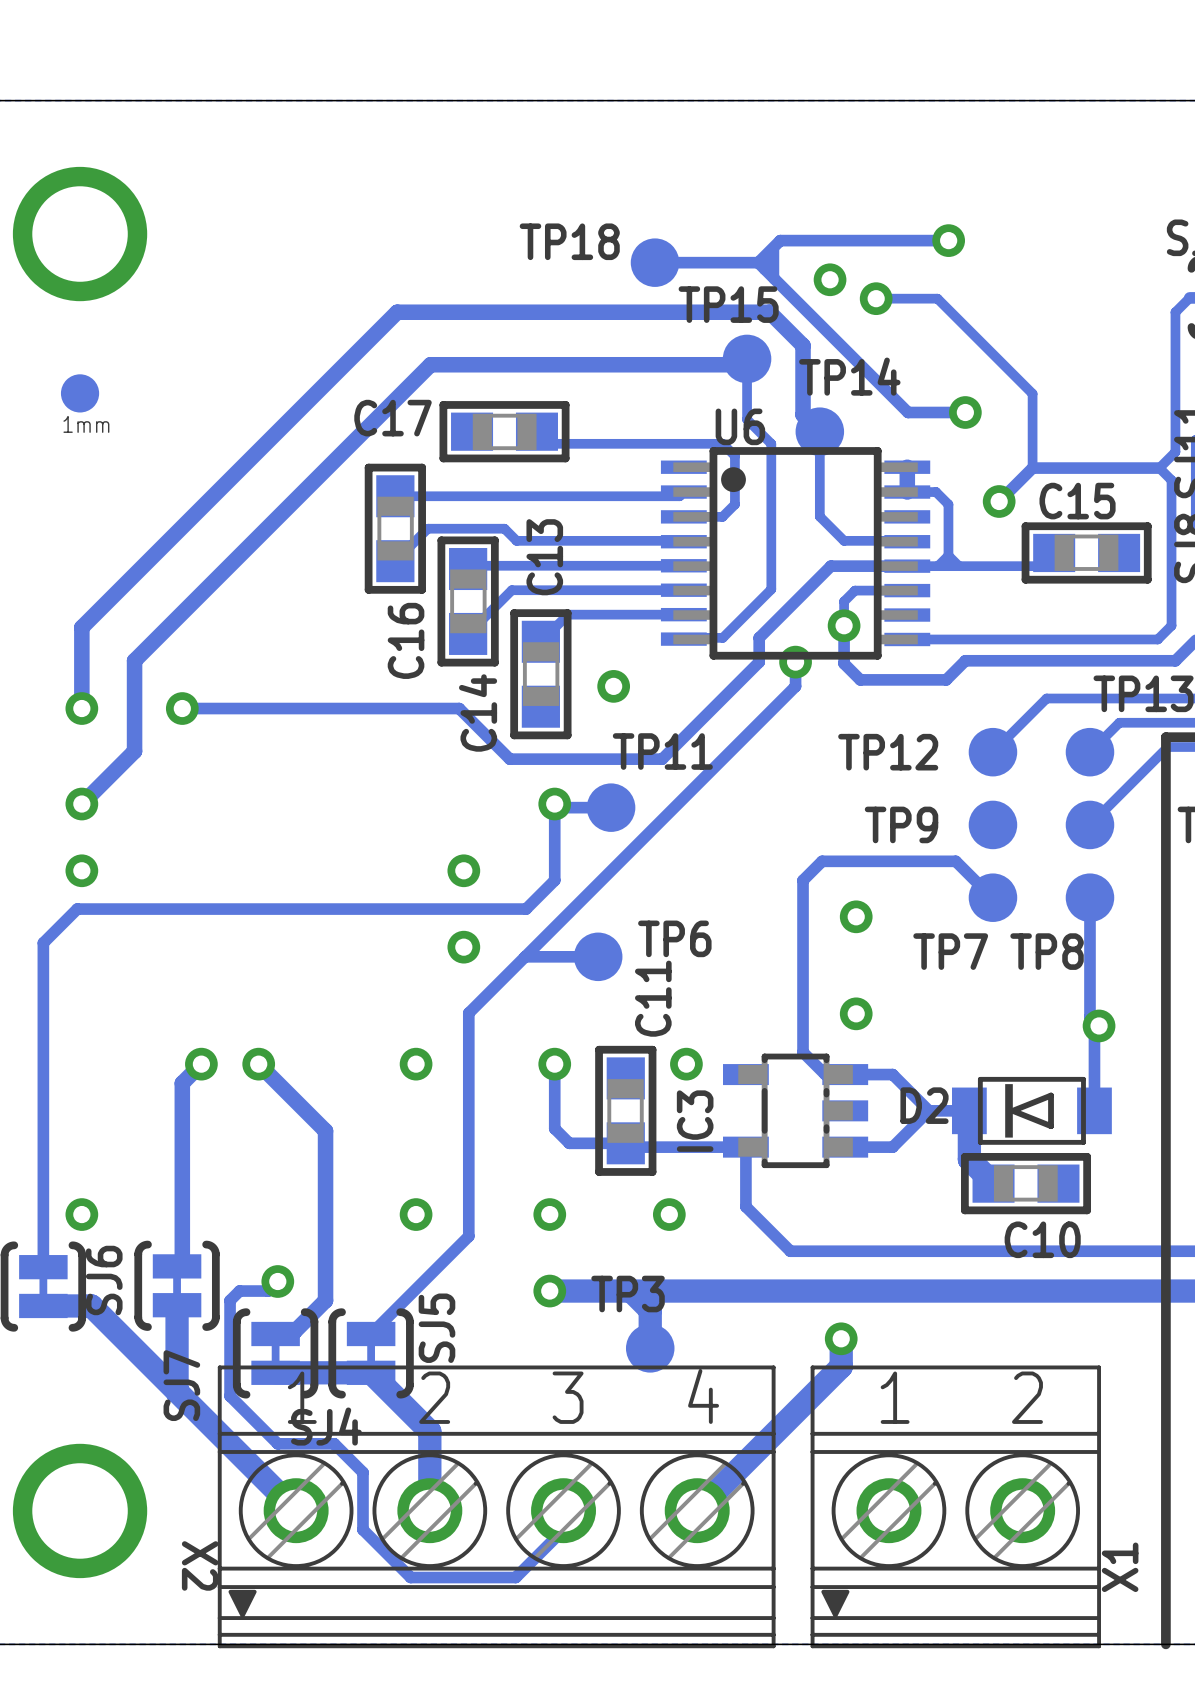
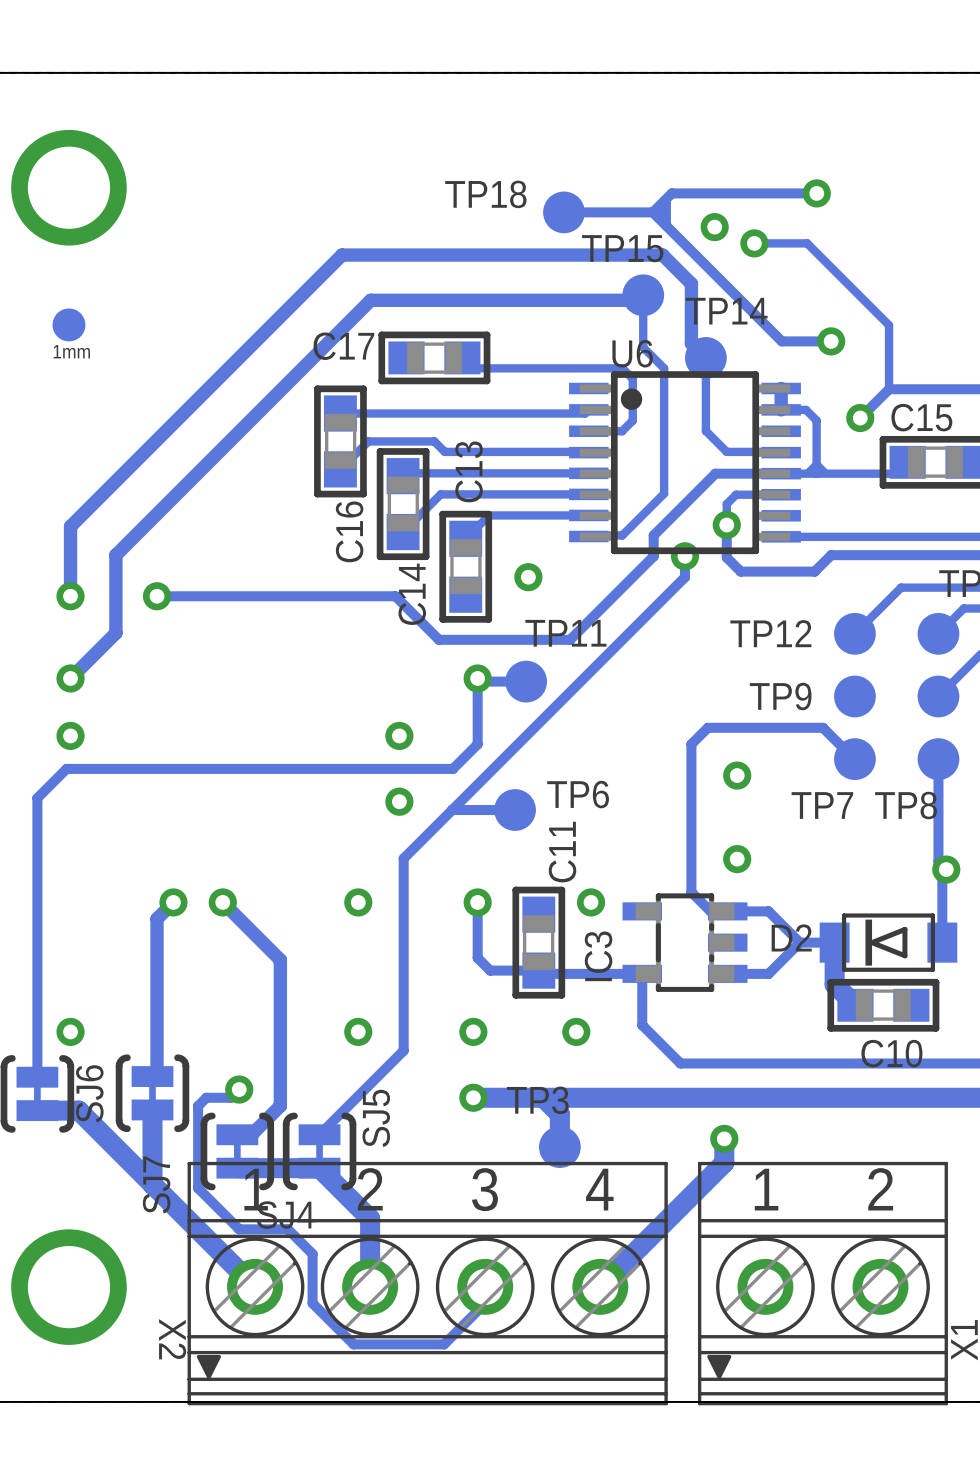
SJ5 name position: SJ5 (436, 1328) -> SJ5 (376, 1118)

